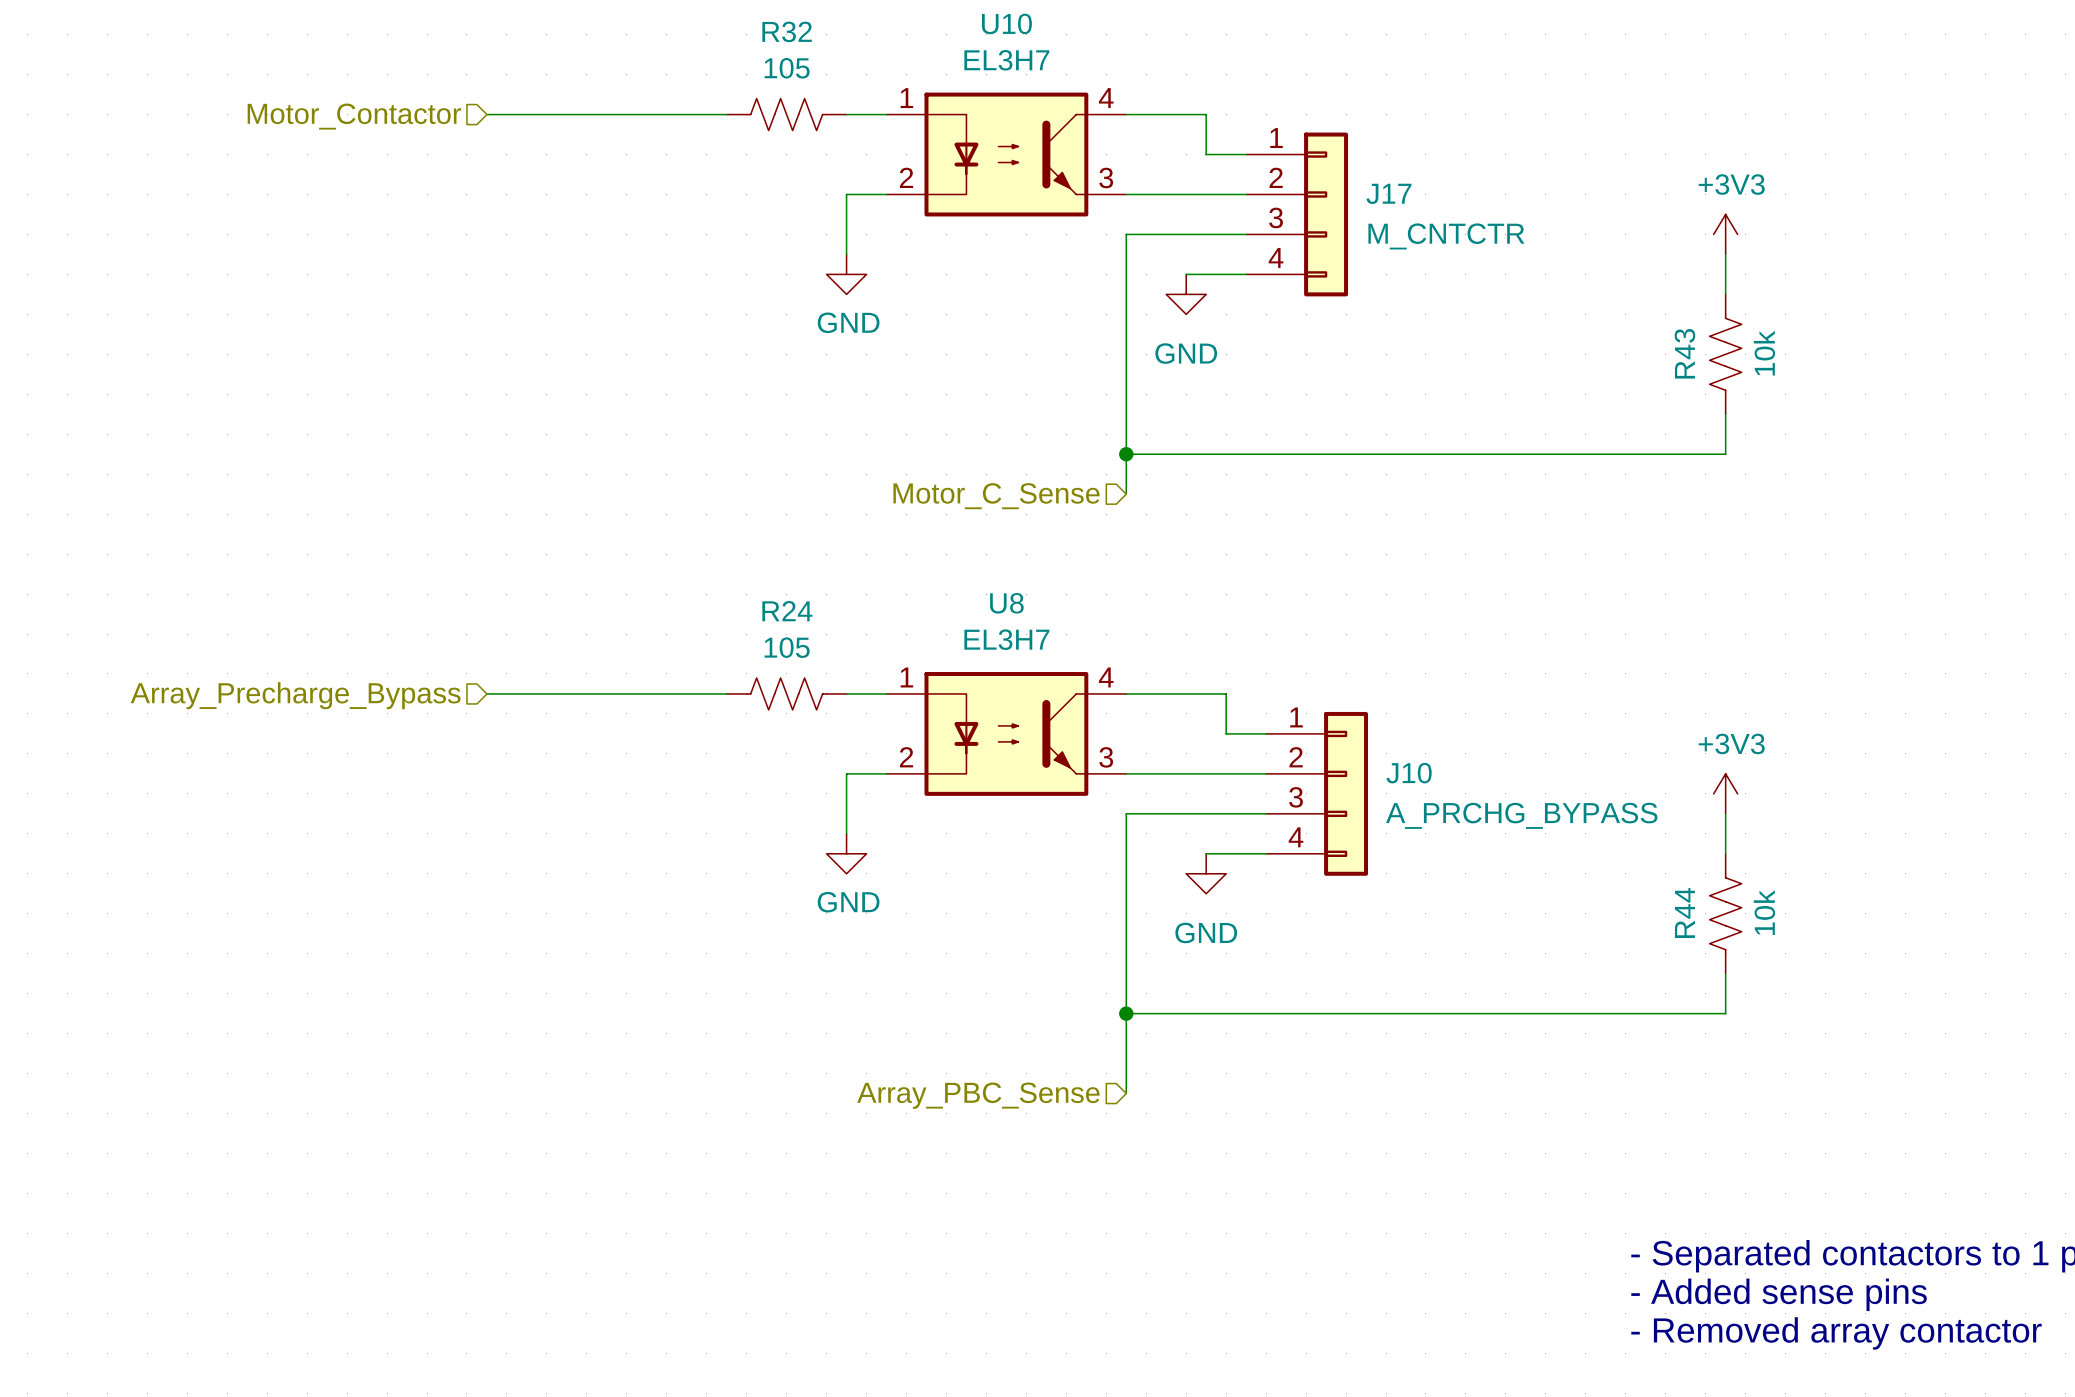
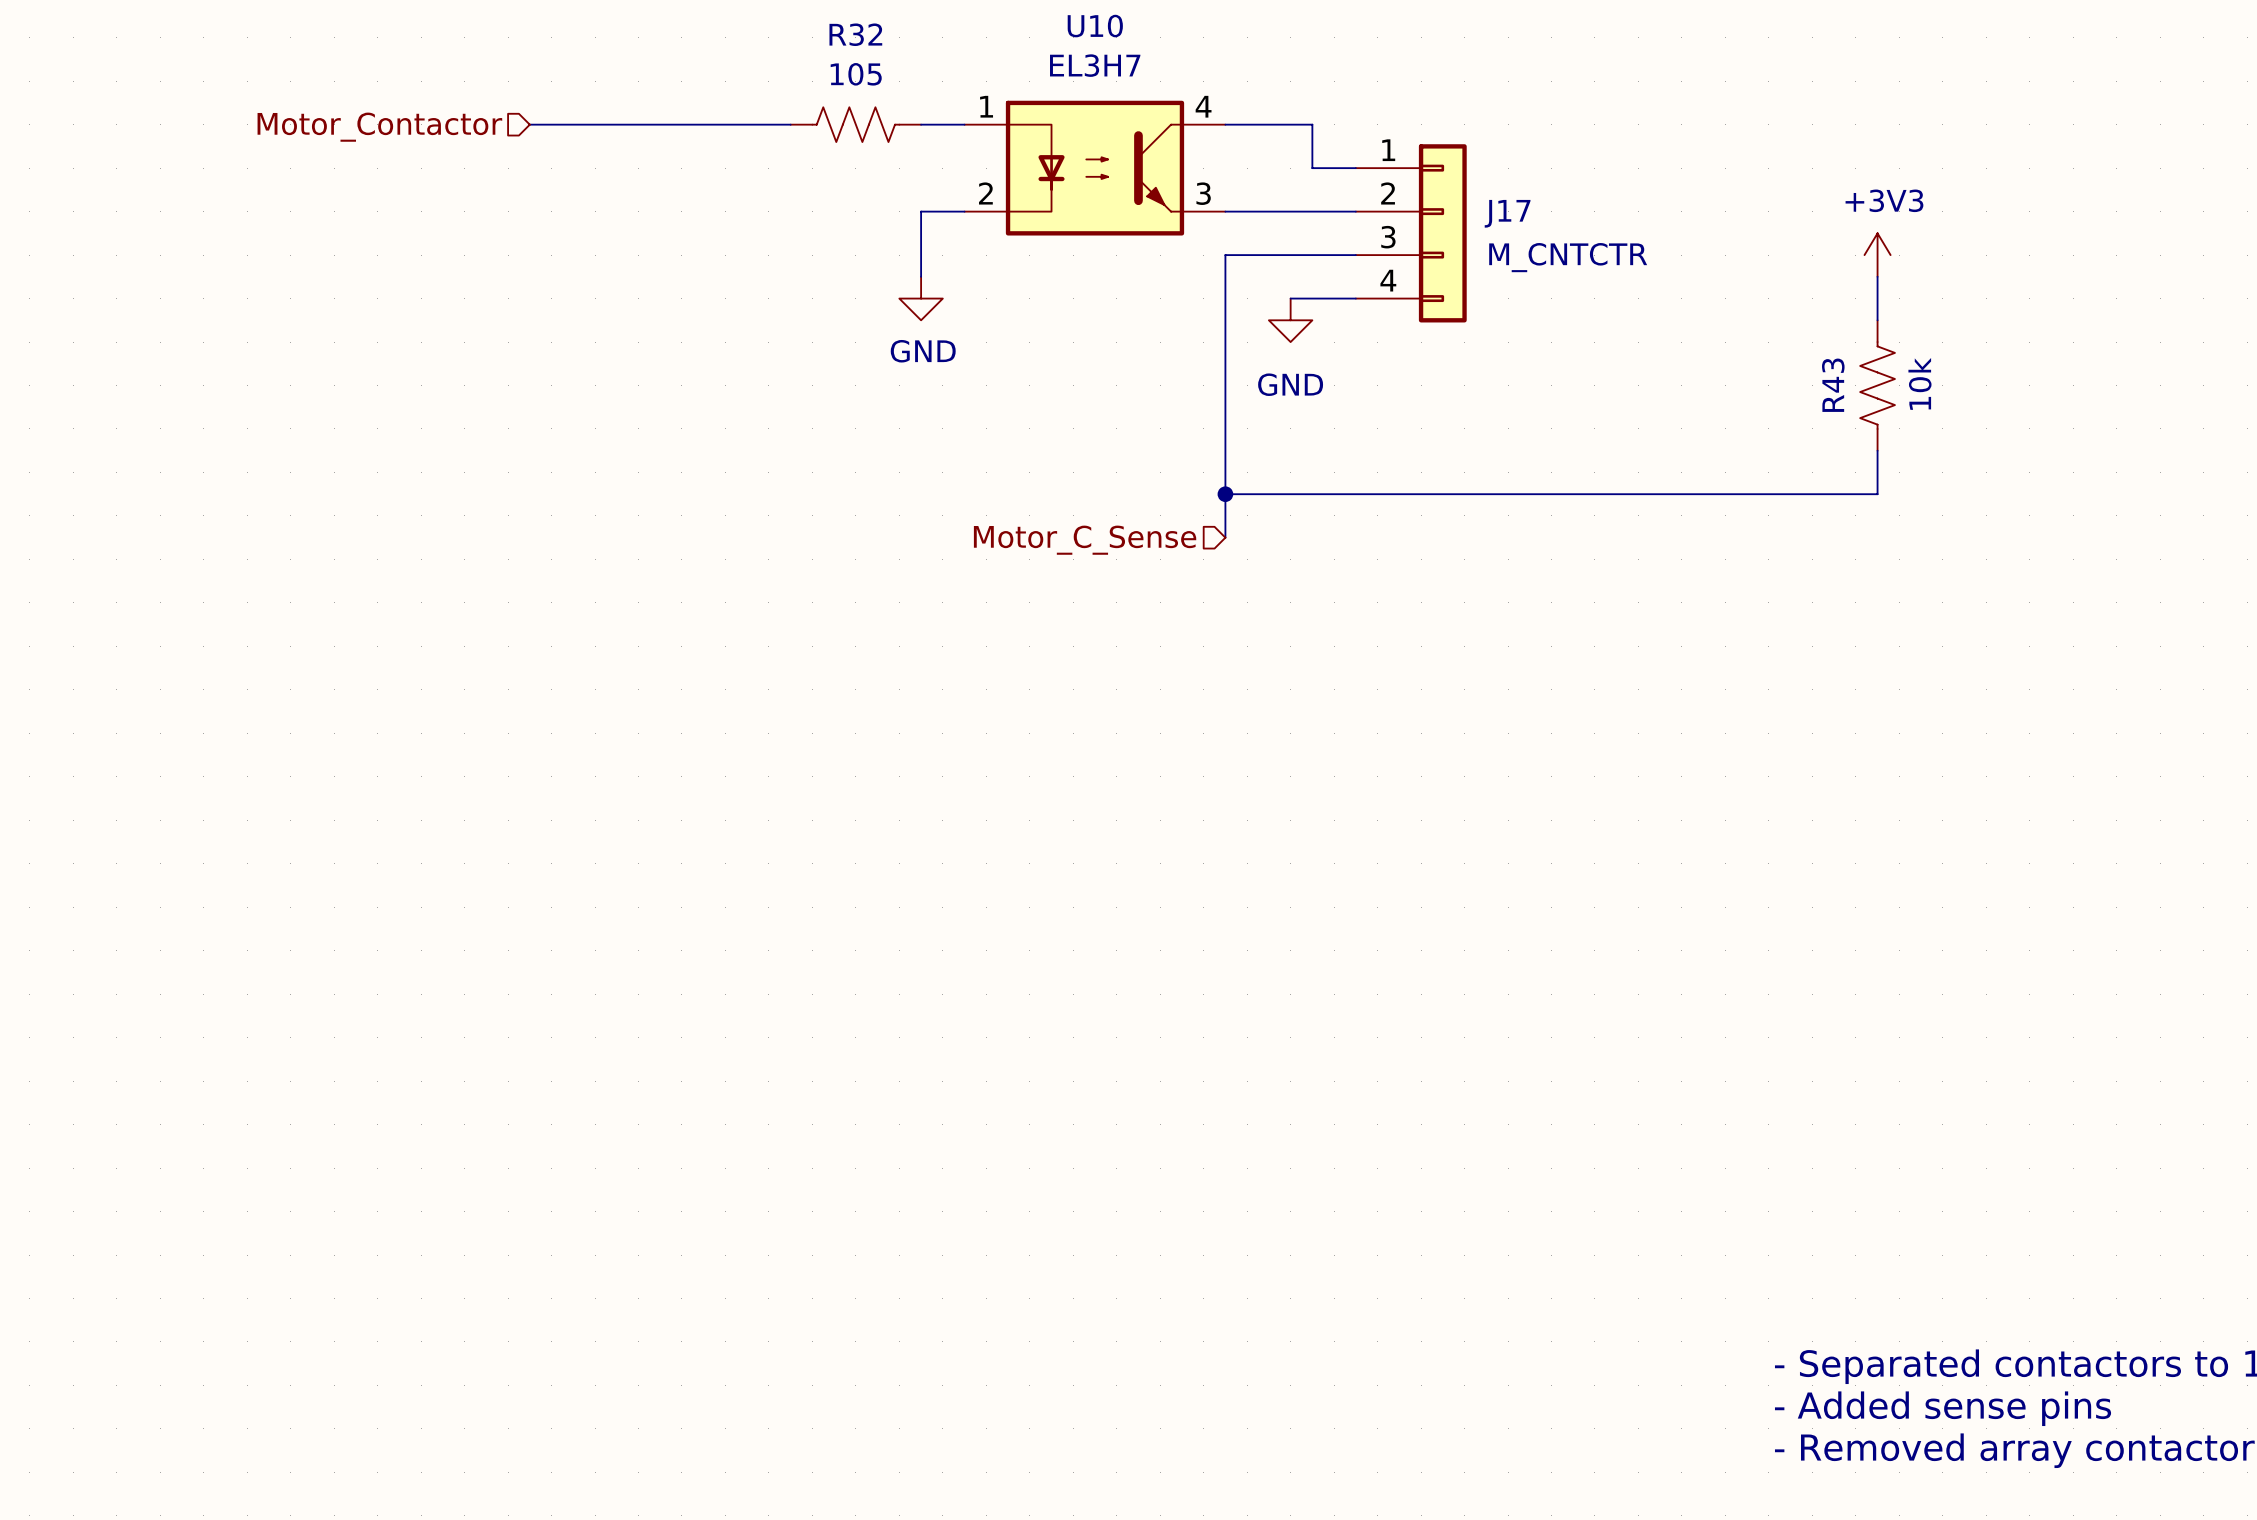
wire: (486, 693) (726, 693) -> none
R24: 105 (786, 693) -> none
wire: (846, 693) (886, 693) -> none
wire: (1126, 693) (1226, 693) (1226, 733) (1266, 733) -> none
hierarchical label: Array_Precharge_Bypass (295, 695) -> none
U8: EL3H7 (1006, 733) -> none
wire: (886, 773) (846, 773) (846, 833) -> none
wire: (1126, 773) (1266, 773) -> none
J10: A_PRCHG_BYPASS (1317, 793) -> none
power symbol: +3V3 (1725, 793) -> none
wire: (1266, 813) (1126, 813) (1126, 1093) -> none
wire: (1725, 813) (1725, 853) -> none
power symbol: GND (846, 853) -> none
wire: (1206, 853) (1266, 853) -> none
power symbol: GND (1206, 873) -> none
R44: 10k (1725, 913) -> none
wire: (1725, 973) (1725, 1013) (1126, 1013) -> none
junction: (1126, 1013) -> none
hierarchical label: Array_PBC_Sense (978, 1095) -> none

